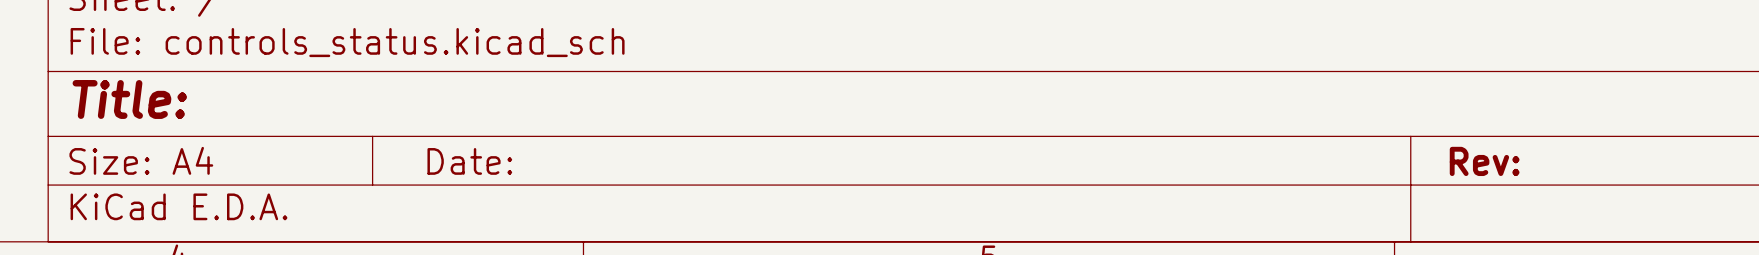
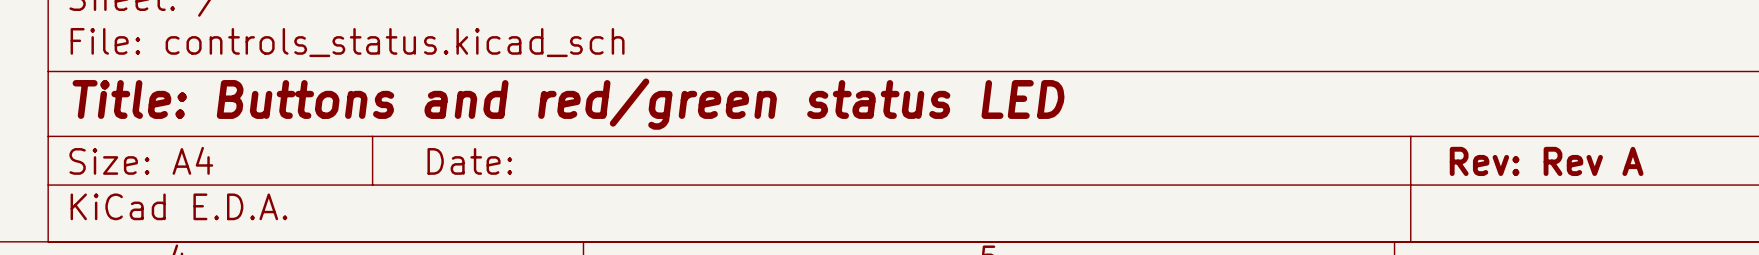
title block: Title: (129, 99) -> Title: Buttons and red/green status LED (568, 104)
title block: Rev: (1484, 161) -> Rev: Rev A (1546, 161)

